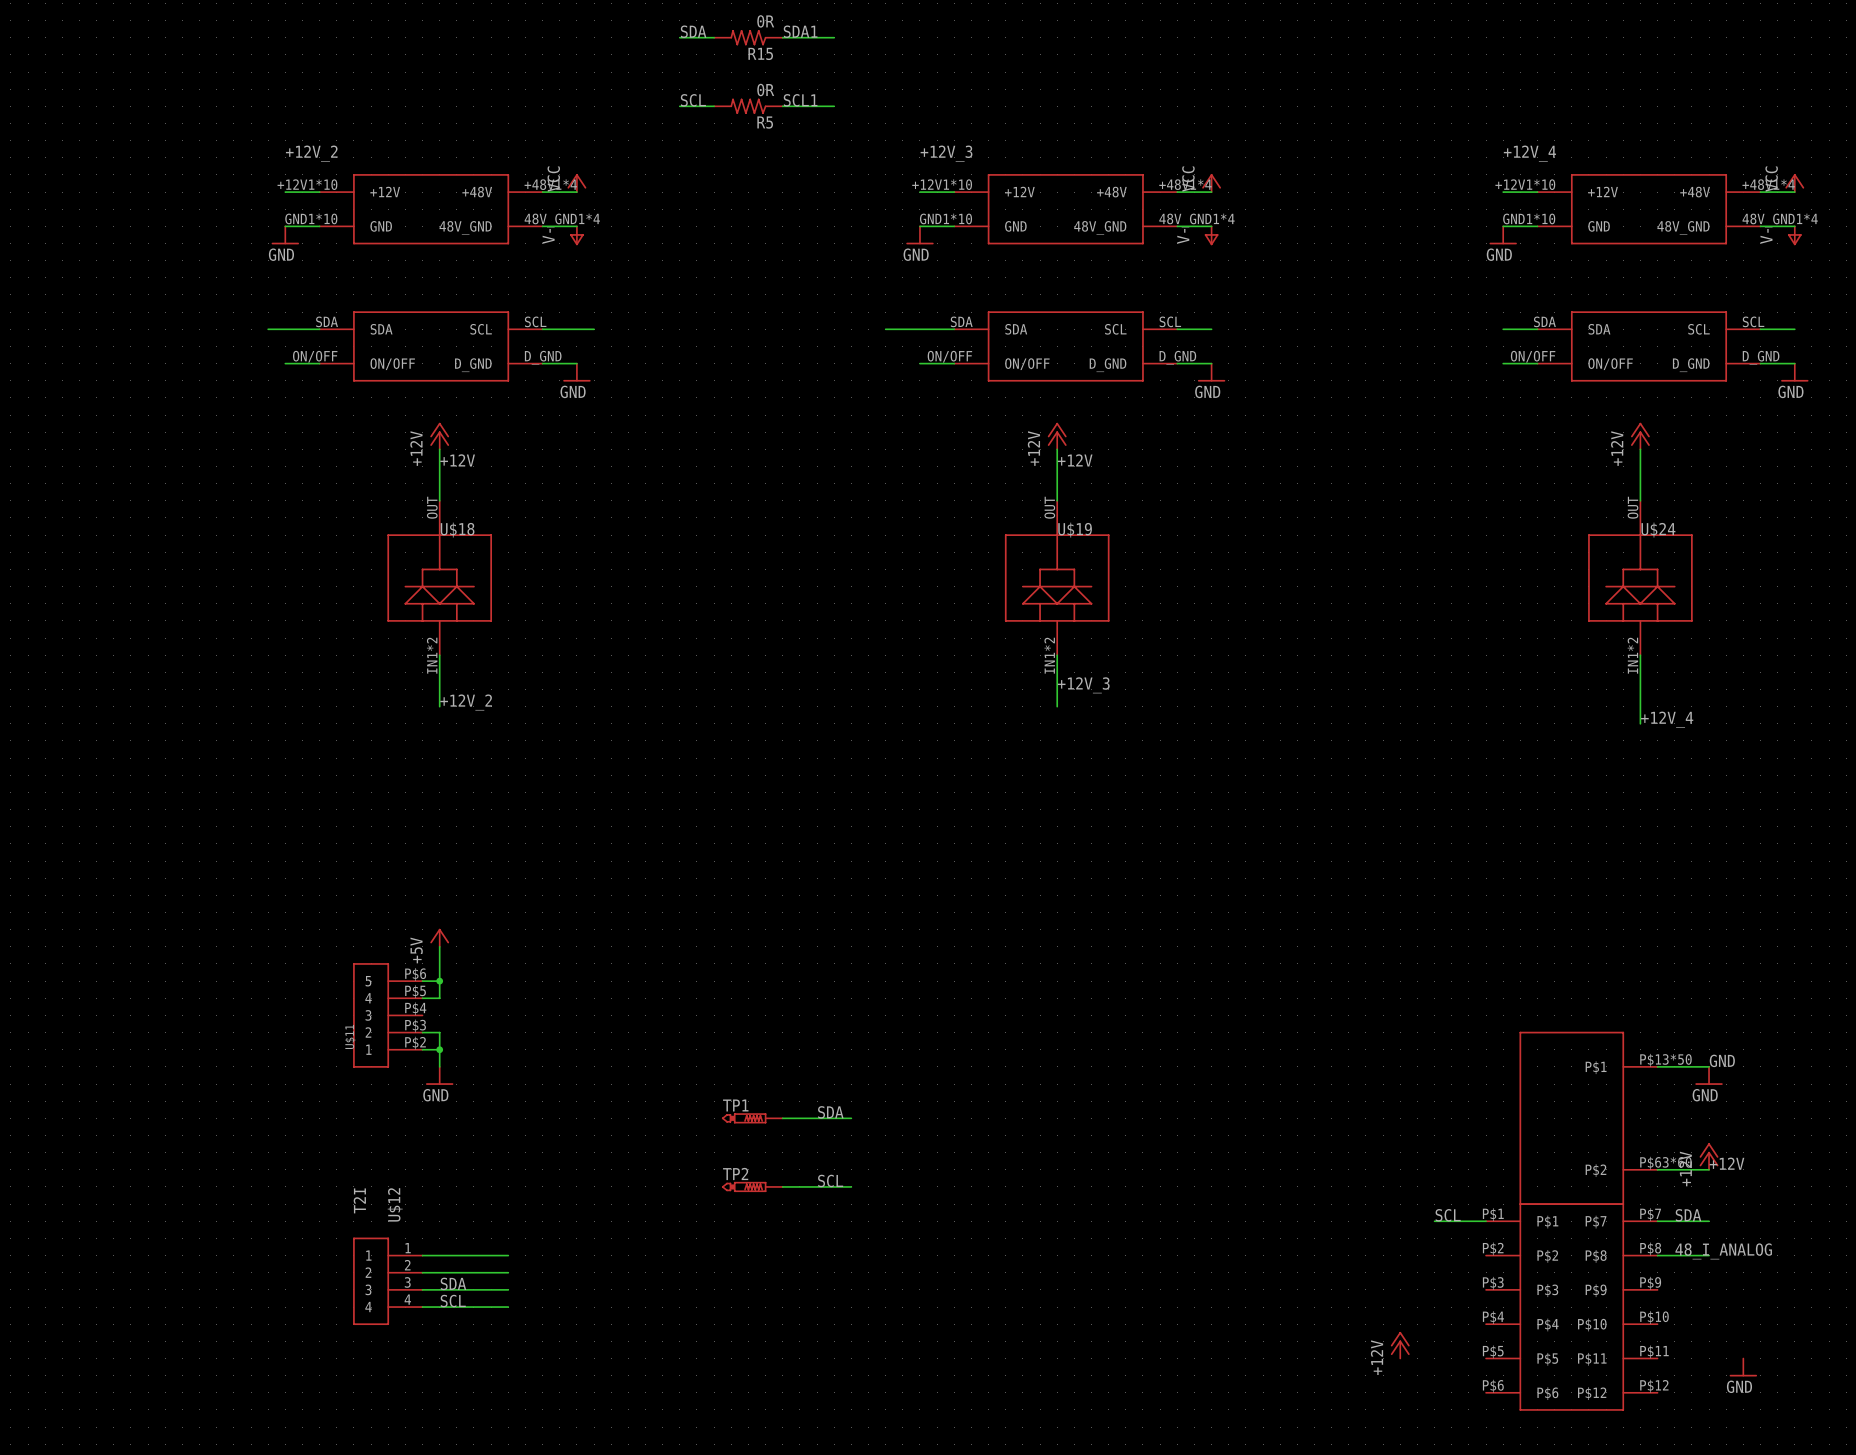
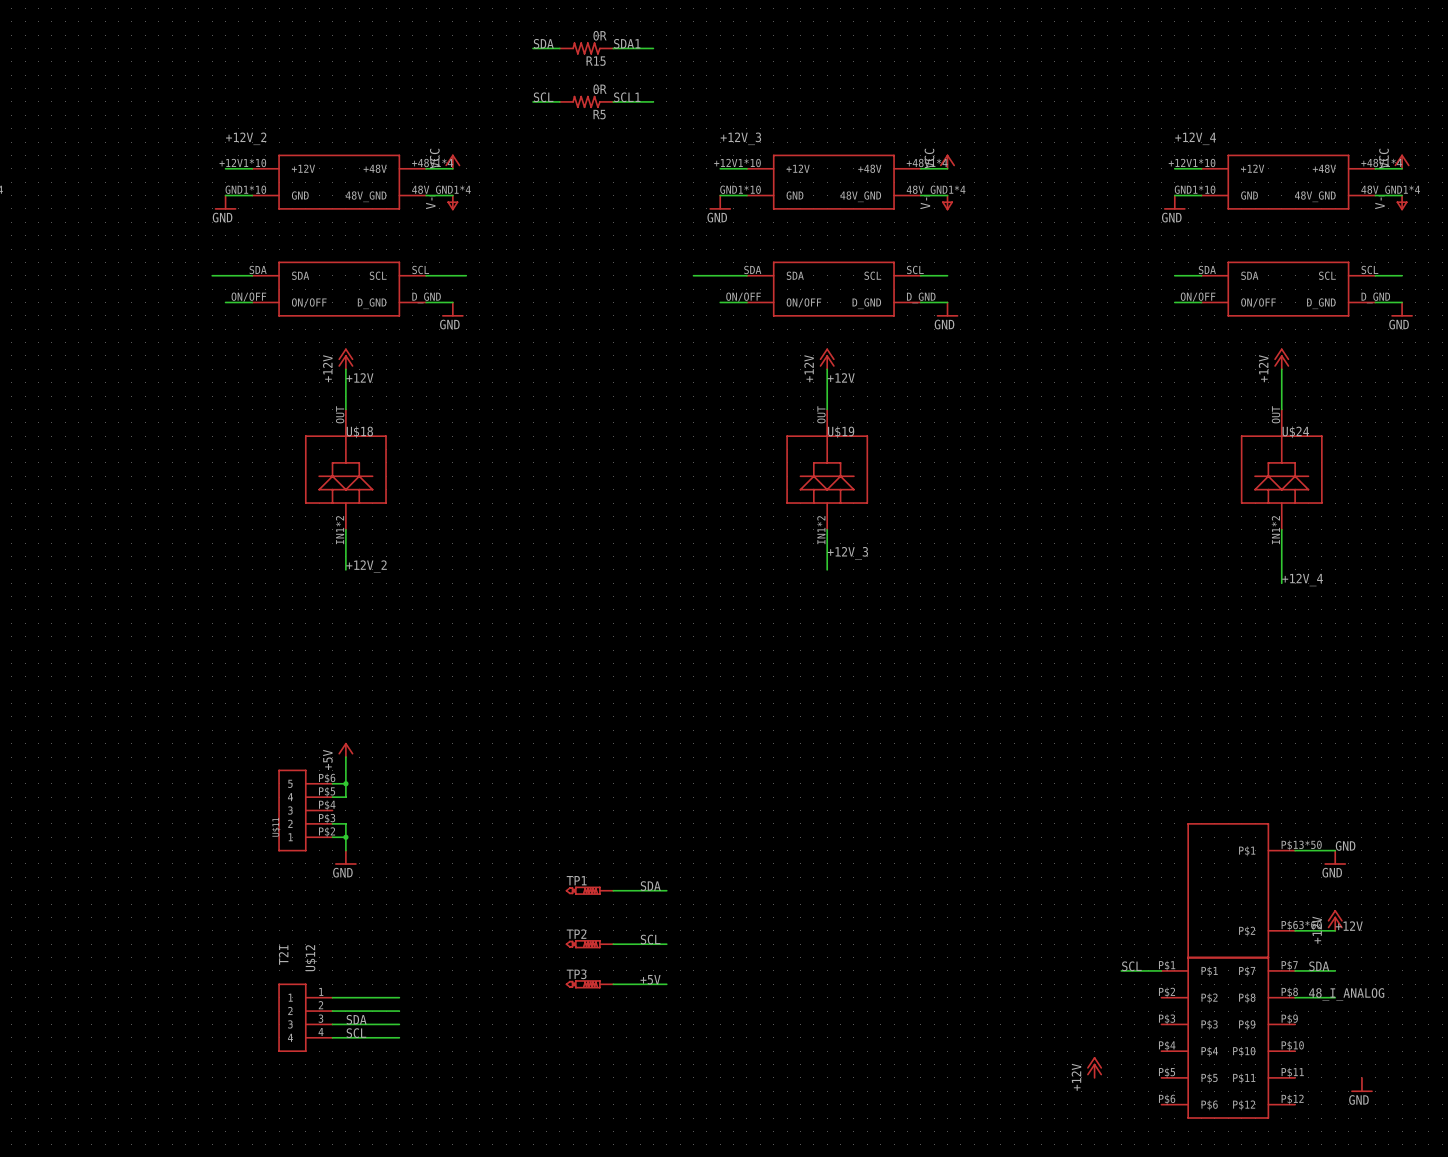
label: none -> +5V (650, 979)
TP3: none -> (589, 984)
wire: none -> (613, 984) (666, 984)

